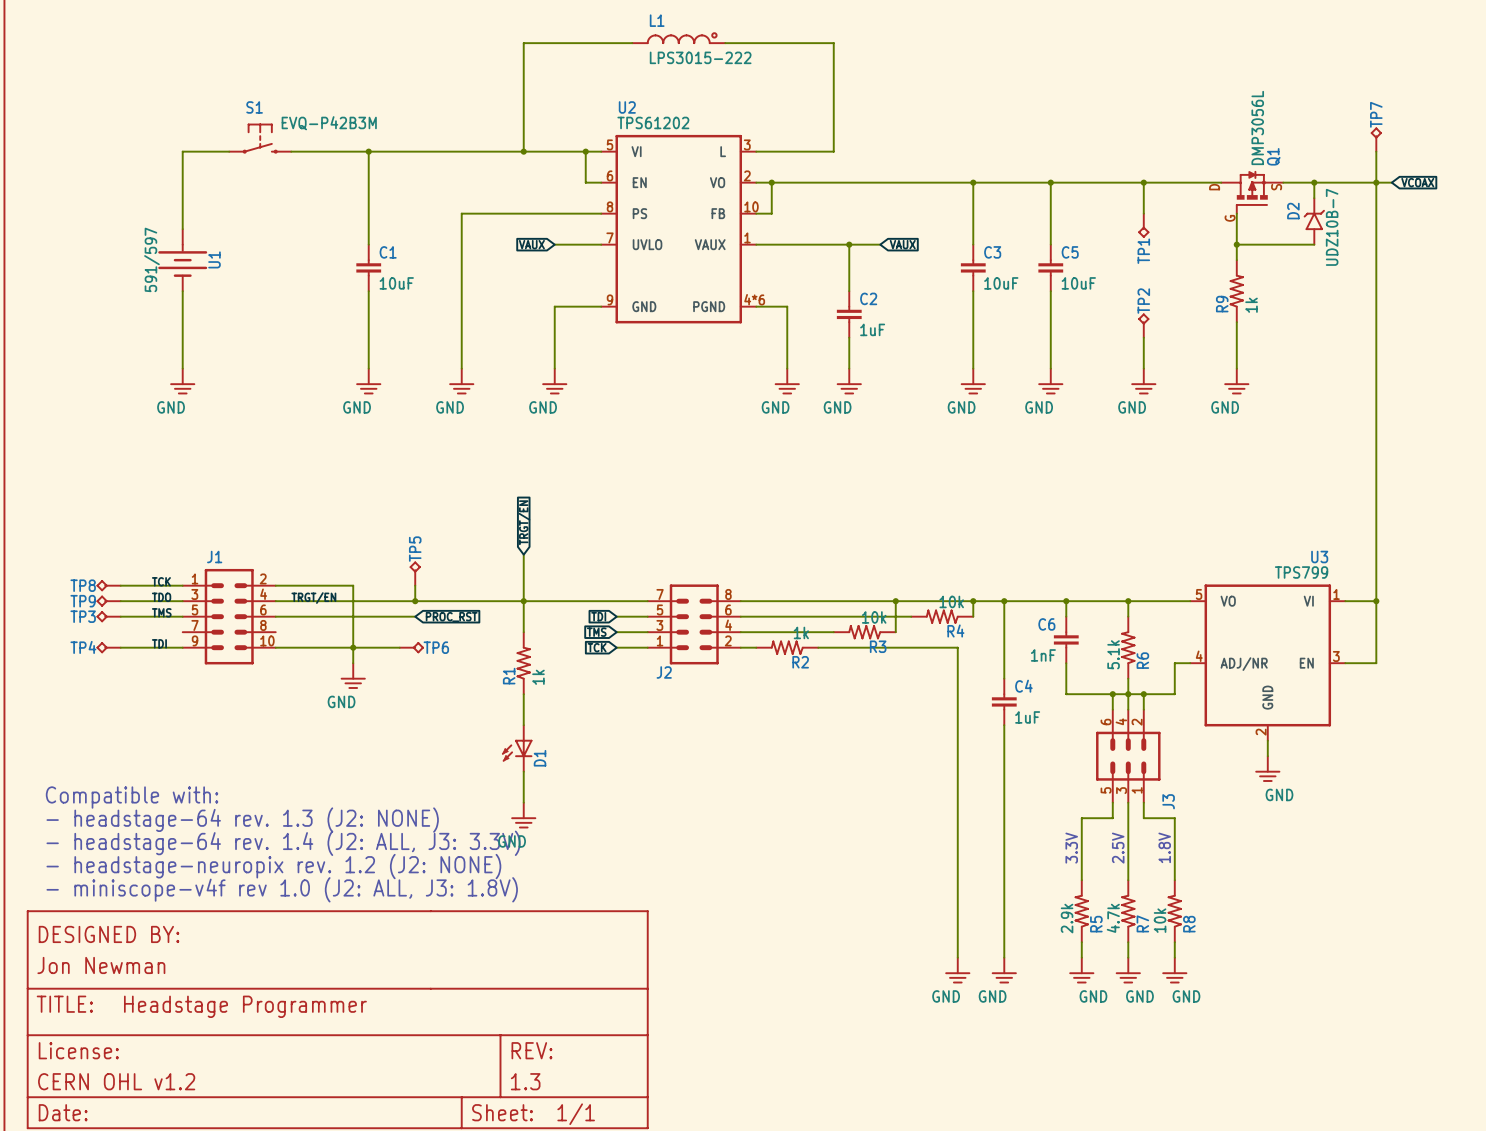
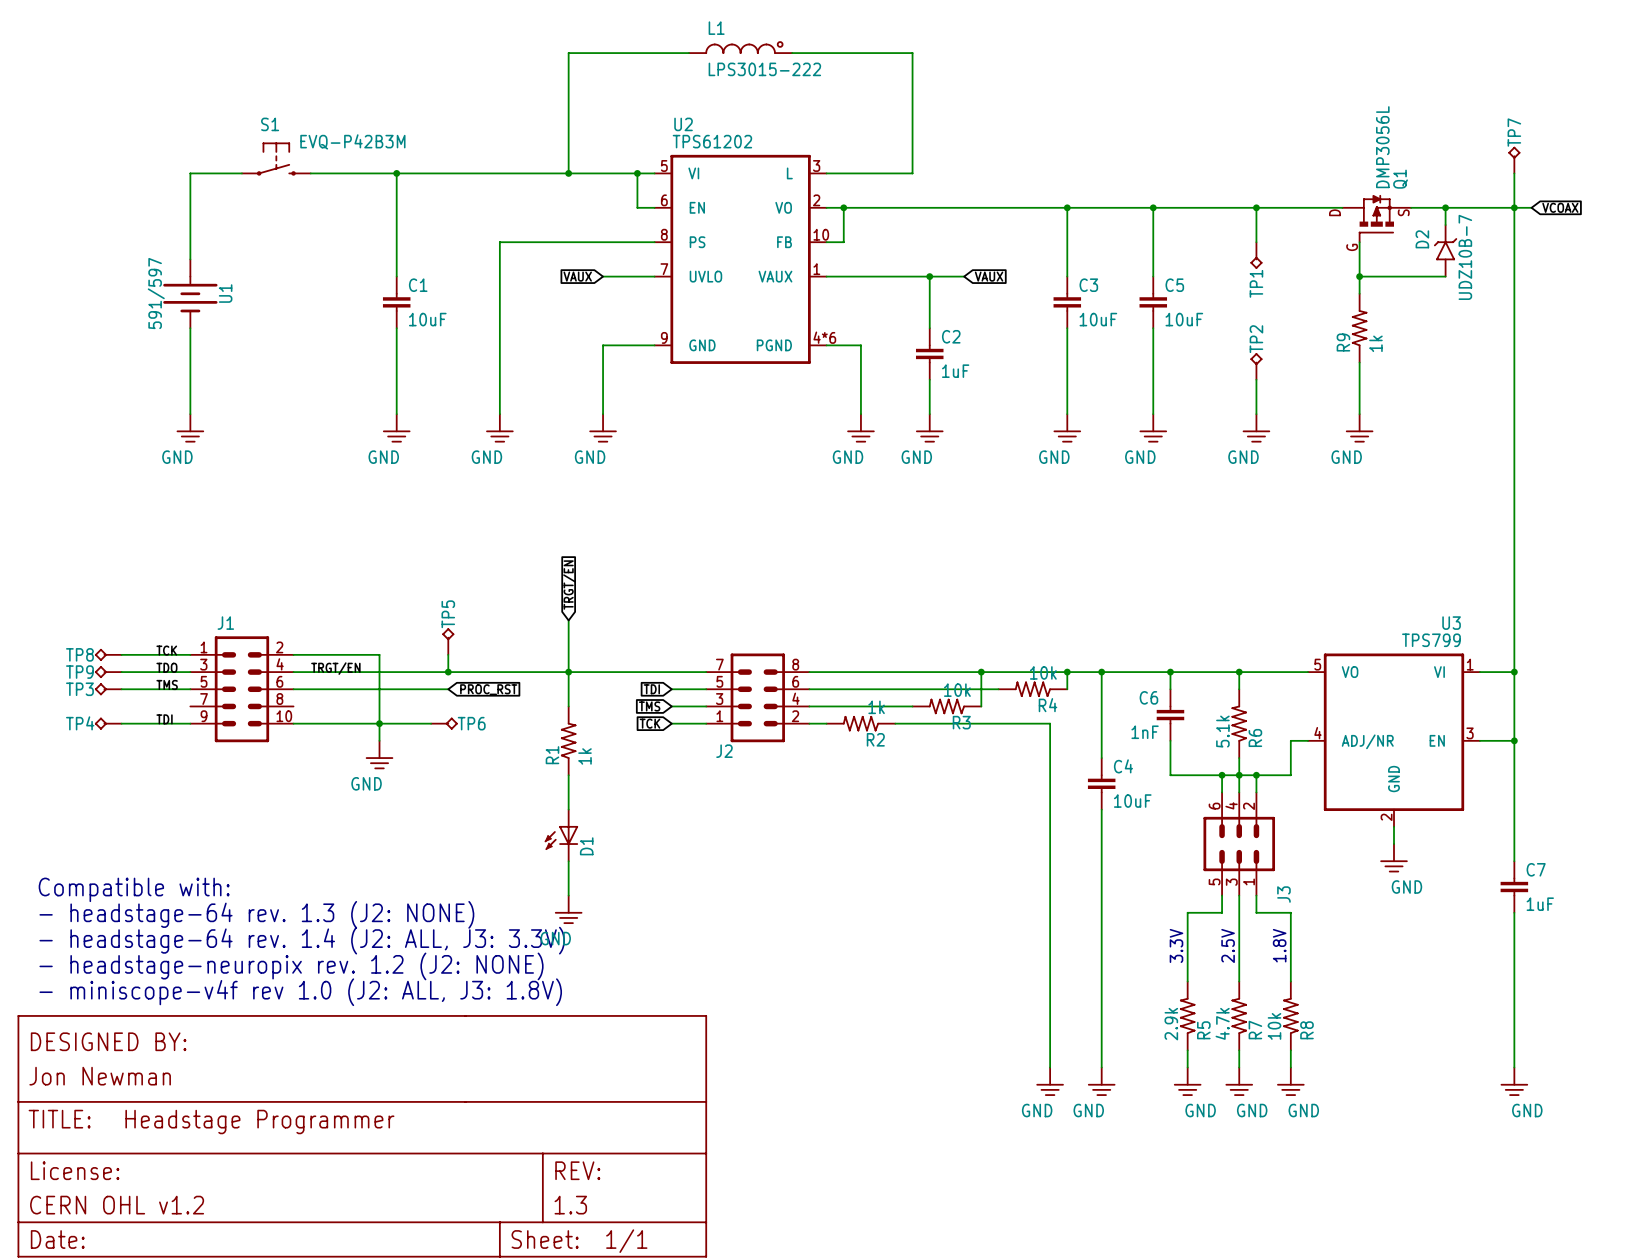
wire: none -> (1514, 740) (1514, 861)
junction: none -> (1514, 740)
C4 value: 1uF (1027, 717) -> 10uF (1132, 801)
C7: none -> 1uF (1514, 887)
wire: none -> (1514, 912) (1514, 1067)
power symbol: none -> GND (1514, 1081)

